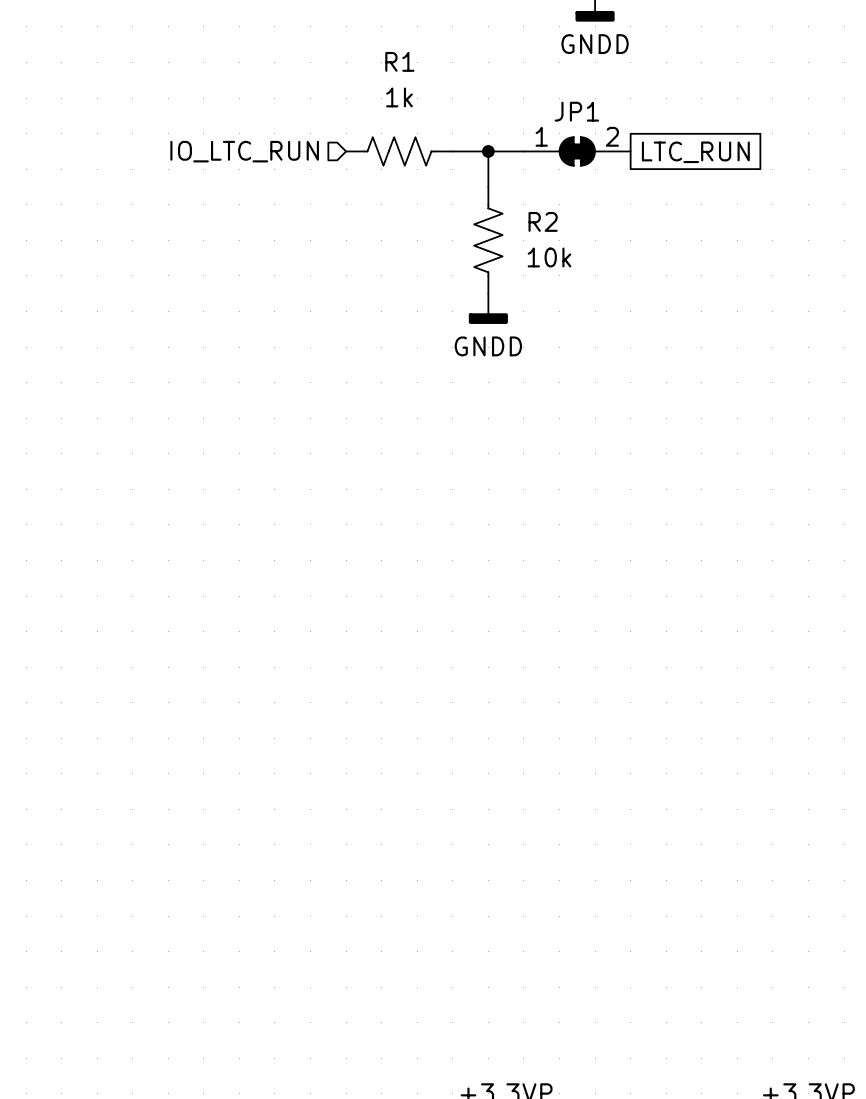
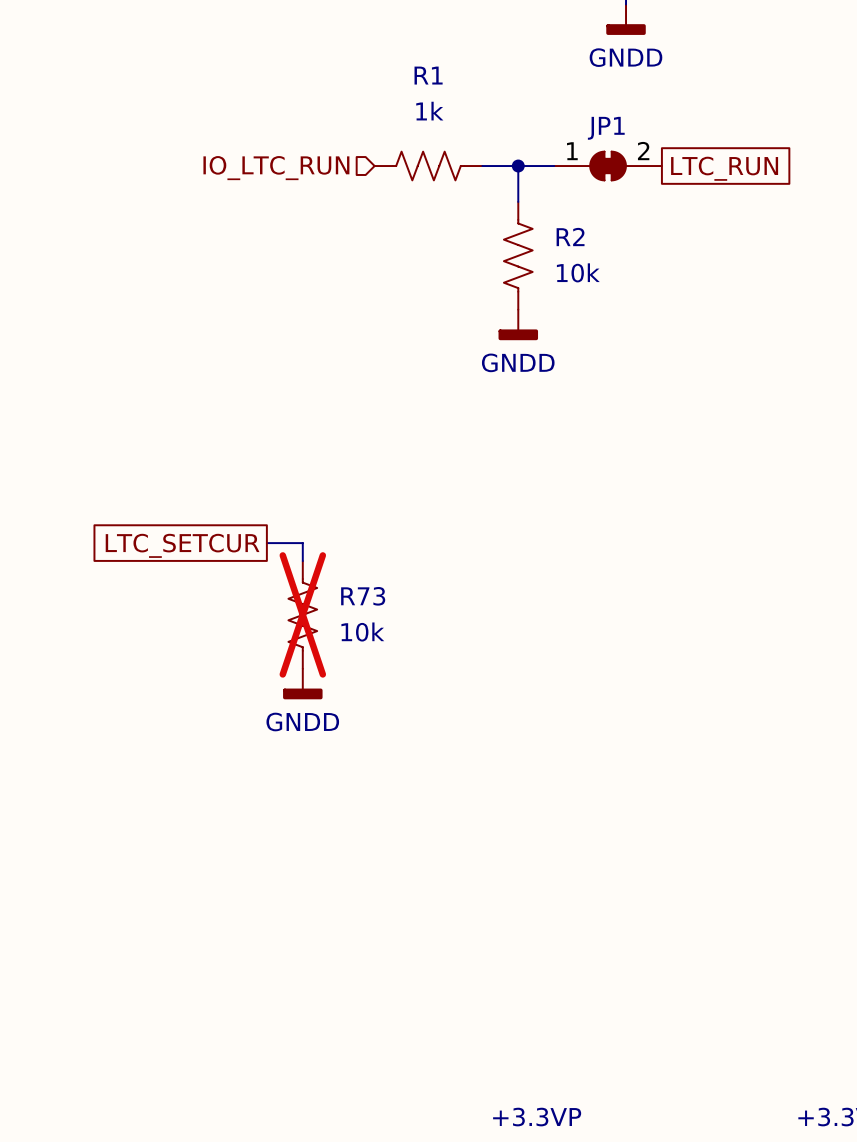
wire: none -> (266, 543) (302, 543) (302, 561)
global label: none -> LTC_SETCUR (182, 545)
R73: none -> 10k (302, 614)
power symbol: none -> GNDD (302, 684)

